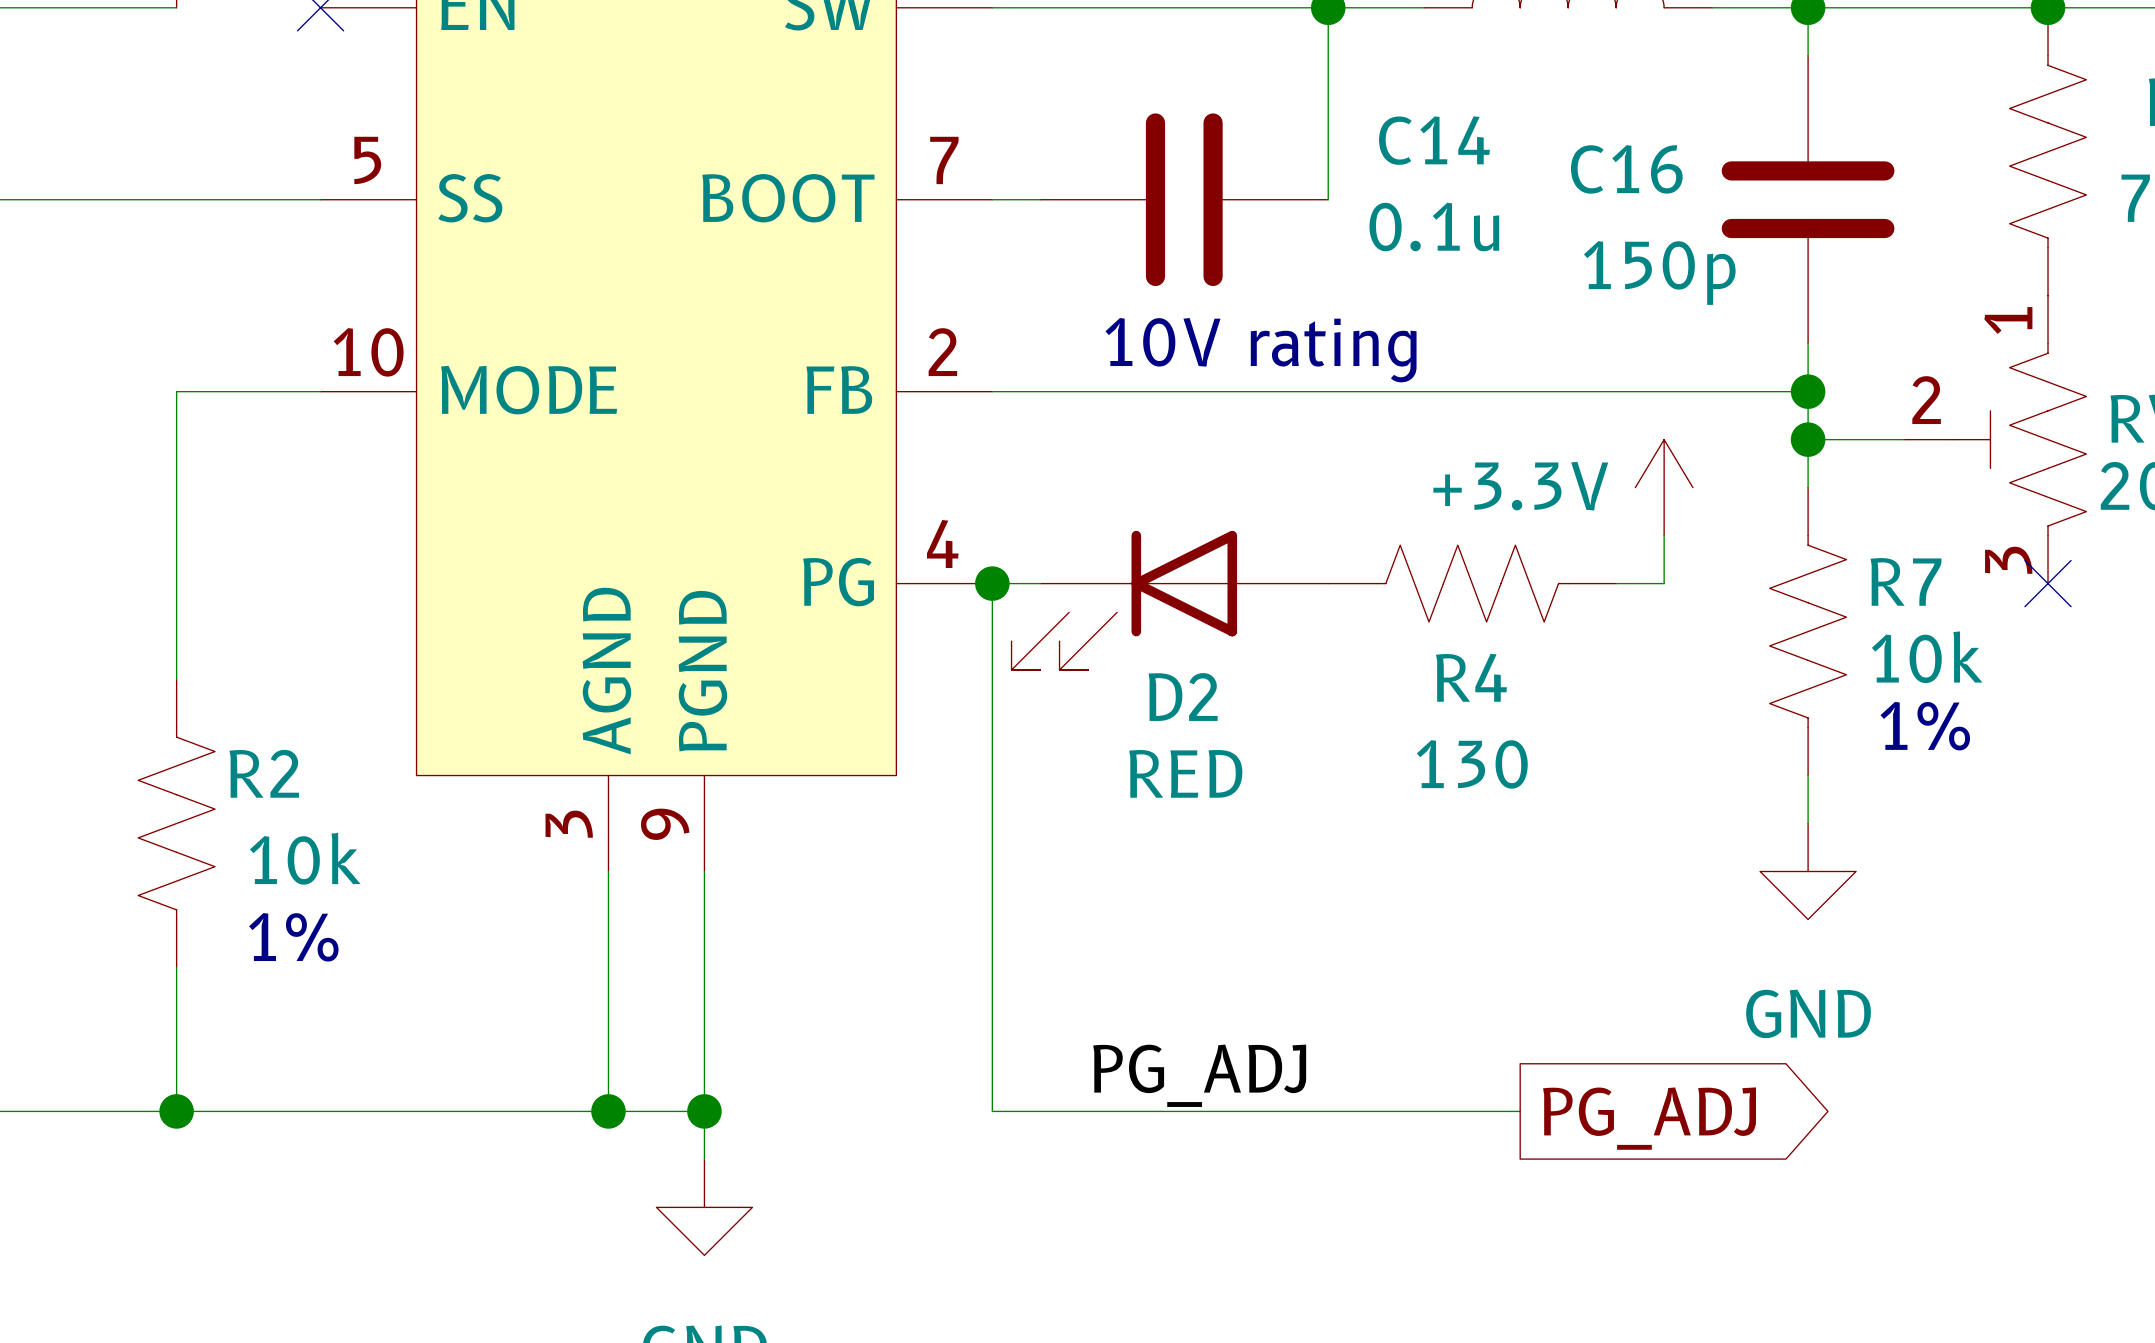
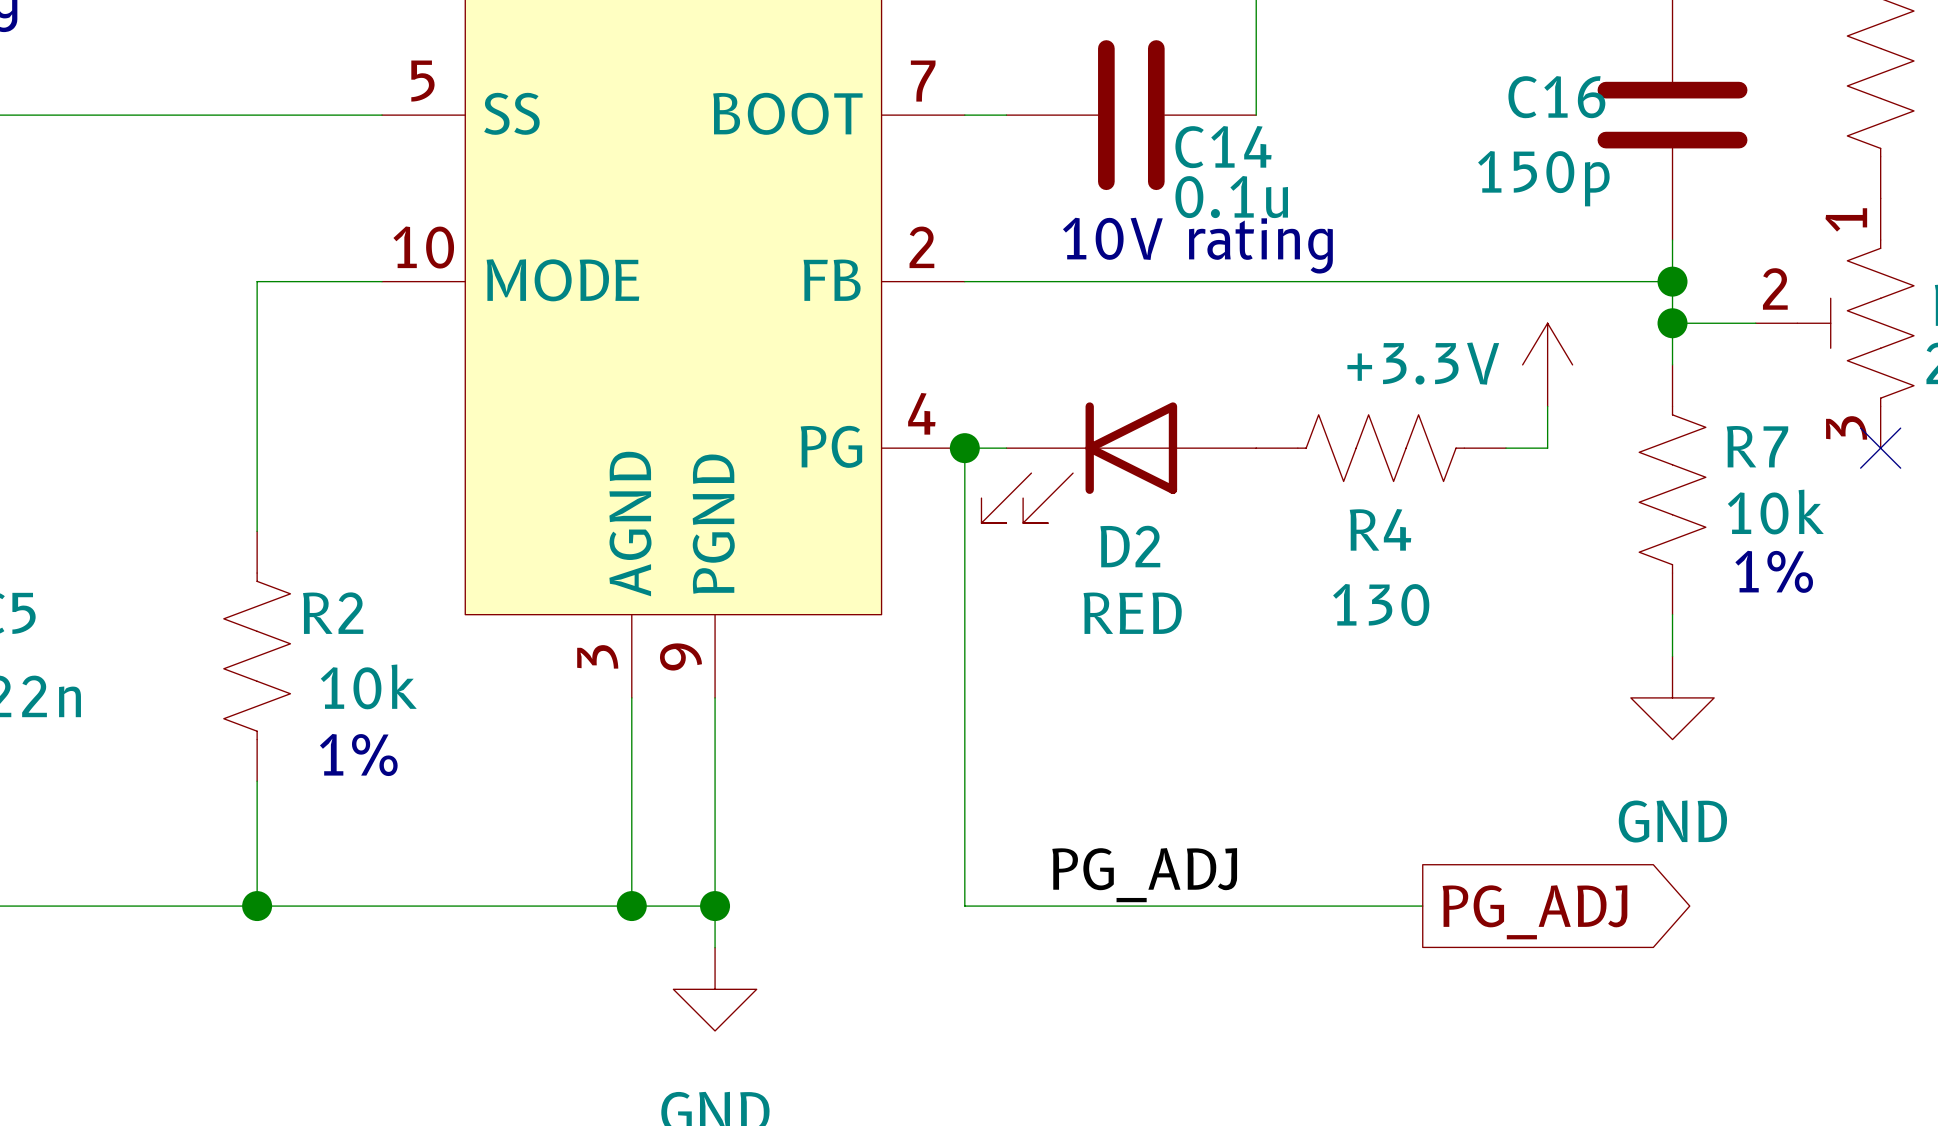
C14 name position: C14 (1434, 140) -> C14 (1223, 147)
C16 name position: C16 (1626, 169) -> C16 (1556, 97)
C14 value position: 0.1u (1434, 226) -> 0.1u (1231, 197)

